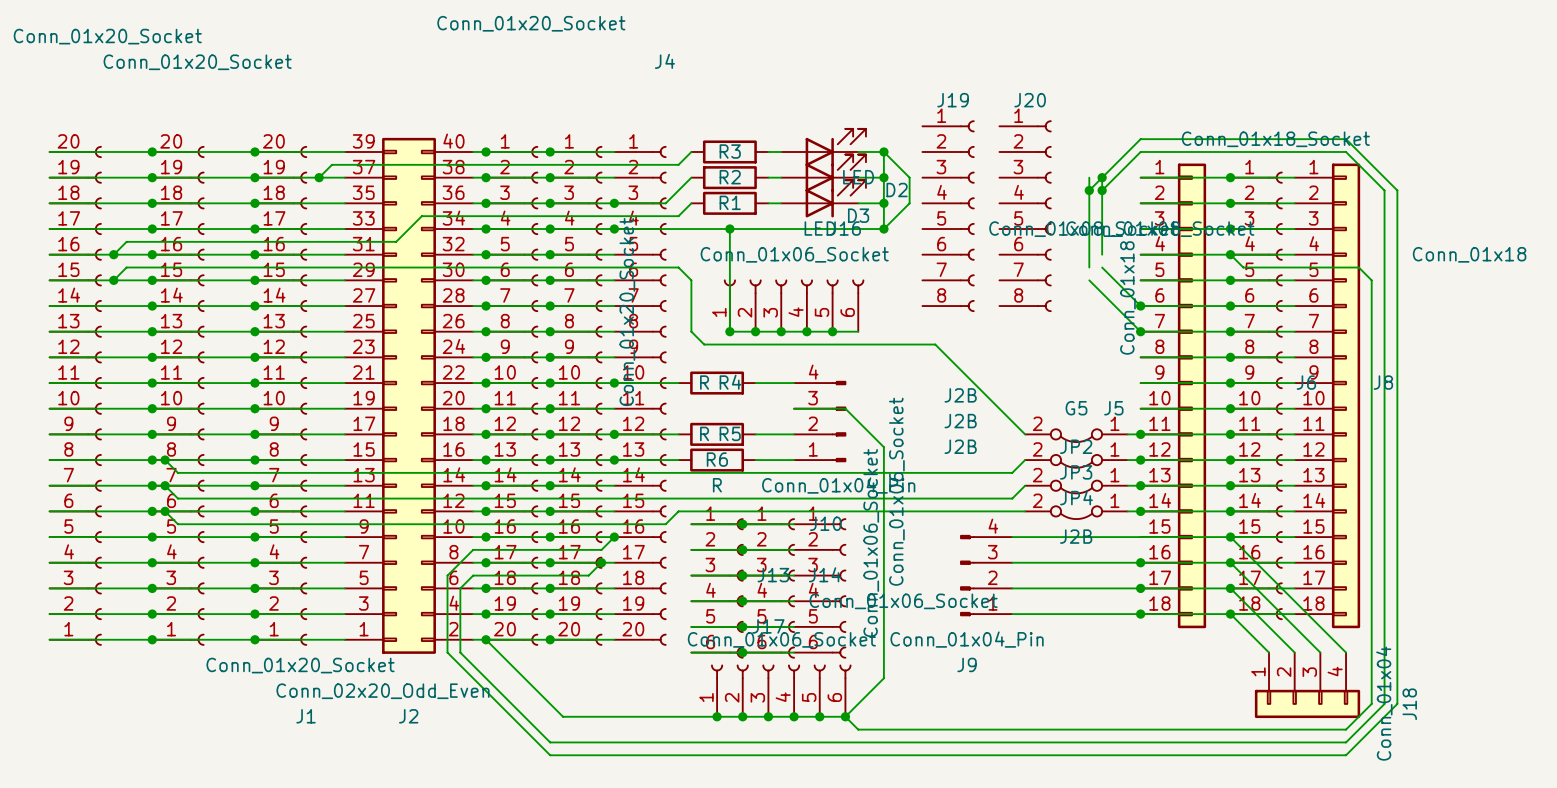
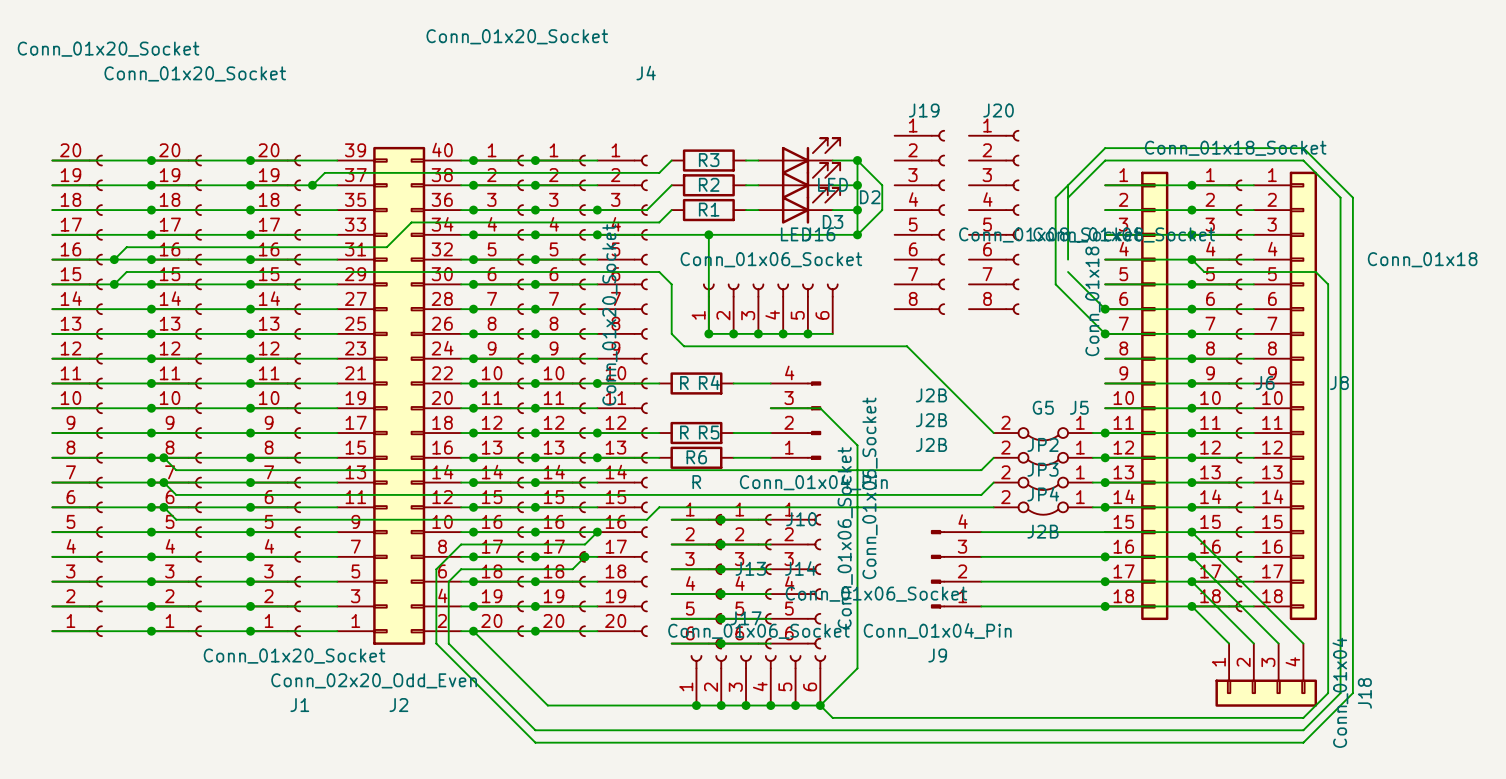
wire: (1089, 177) (1089, 190) -> (1055, 272) (1055, 284)
junction: (1102, 177) -> none
junction: (1089, 190) -> none
junction: (1102, 190) -> none

